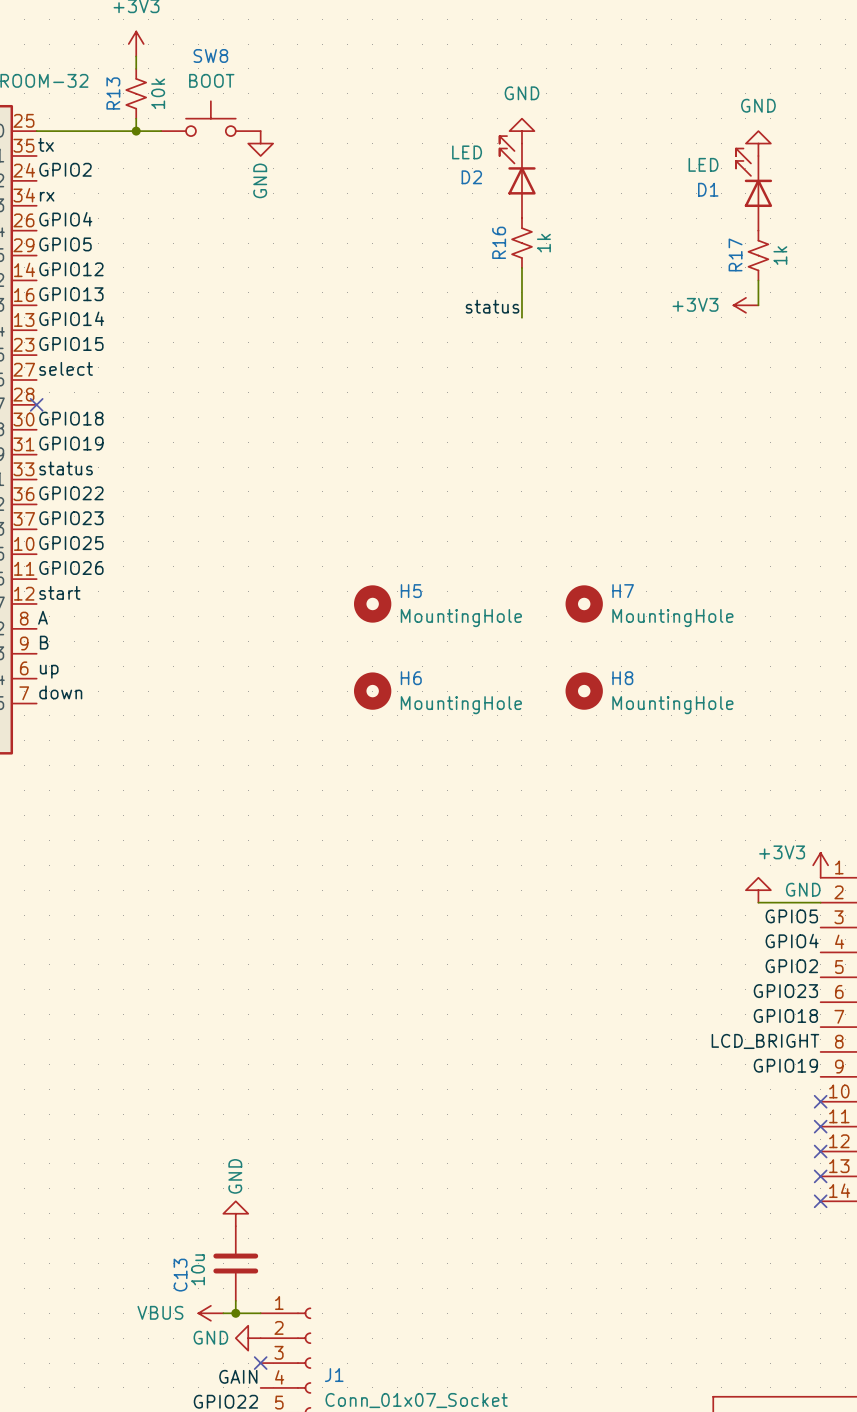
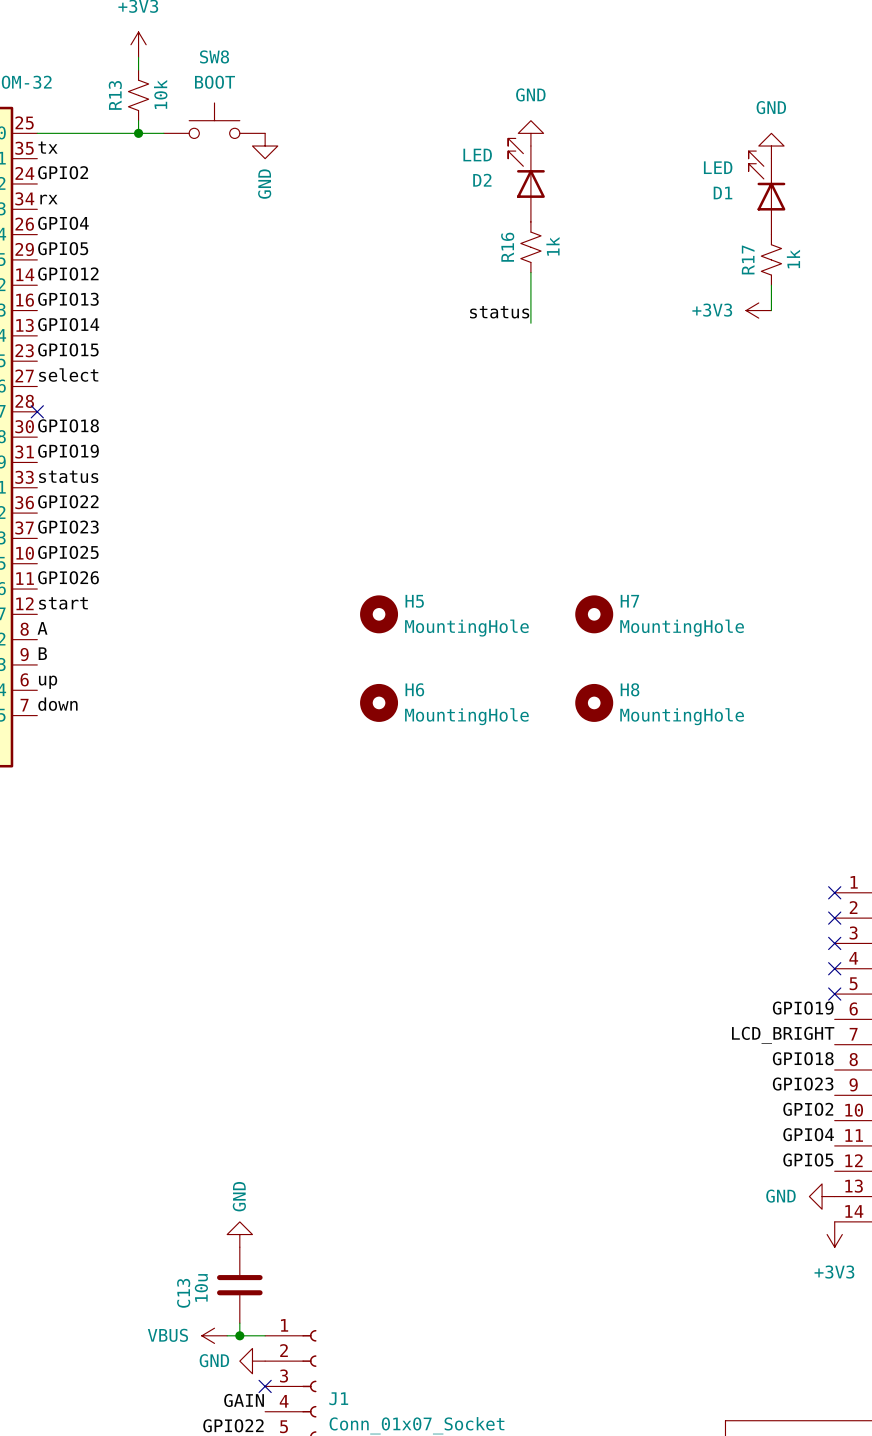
power symbol: +3V3 (820, 865) -> none
no-connect mark: none -> (834, 892)
power symbol: GND (758, 890) -> none
wire: (758, 902) (820, 902) -> none
no-connect mark: none -> (834, 918)
label position: GPIO5 (791, 916) -> GPIO5 (808, 1159)
no-connect mark: none -> (834, 943)
label position: GPIO4 (792, 941) -> GPIO4 (808, 1134)
no-connect mark: none -> (834, 968)
label position: GPIO2 (791, 966) -> GPIO2 (808, 1109)
no-connect mark: none -> (834, 994)
label: GPIO23 (785, 991) -> GPIO19 (803, 1008)
label: GPIO18 (785, 1015) -> LCD_BRIGHT (783, 1035)
label: LCD_BRIGHT (765, 1041) -> GPIO18 (803, 1058)
label: GPIO19 (785, 1065) -> GPIO23 (803, 1084)
no-connect mark: (820, 1101) -> none
no-connect mark: (820, 1126) -> none
no-connect mark: (820, 1151) -> none
power symbol: none -> GND (822, 1196)
no-connect mark: (820, 1176) -> none
no-connect mark: (820, 1201) -> none
power symbol: none -> +3V3 (834, 1234)

